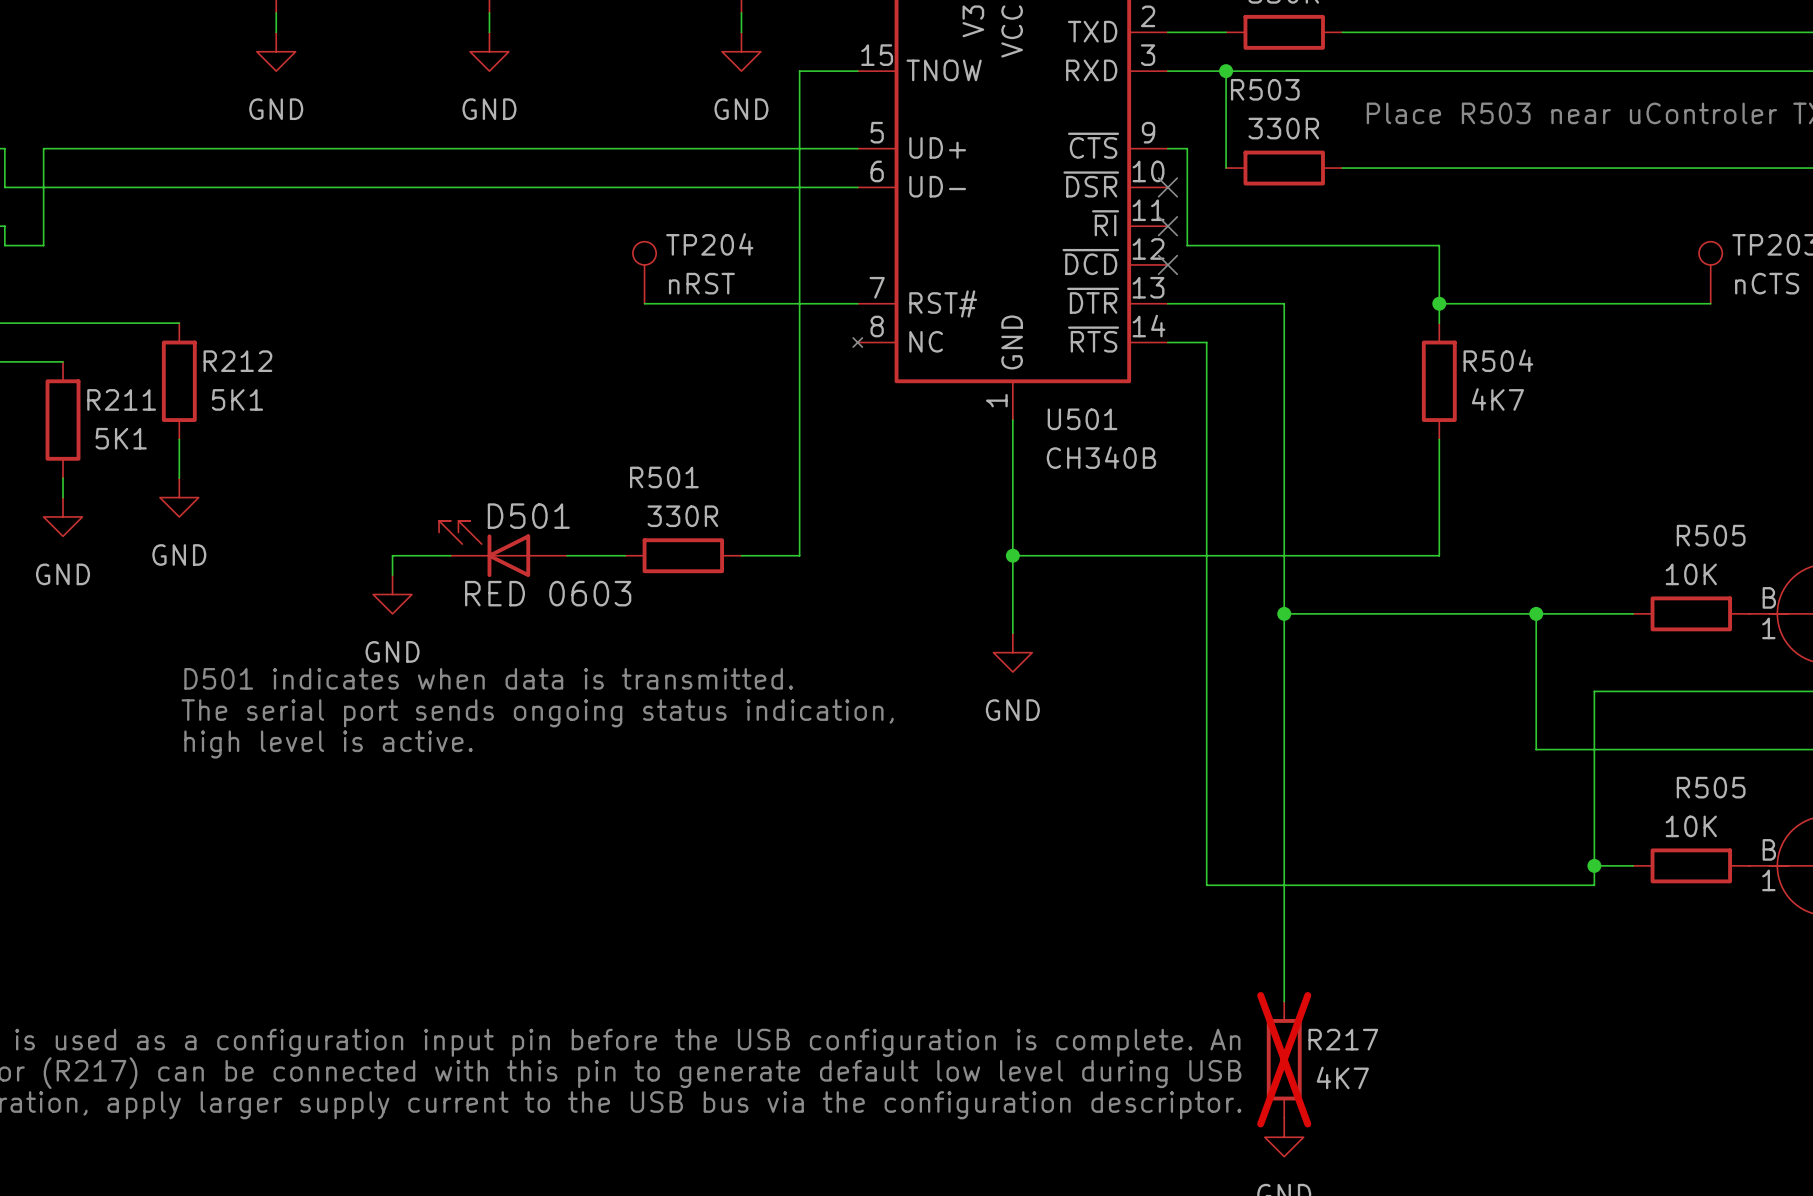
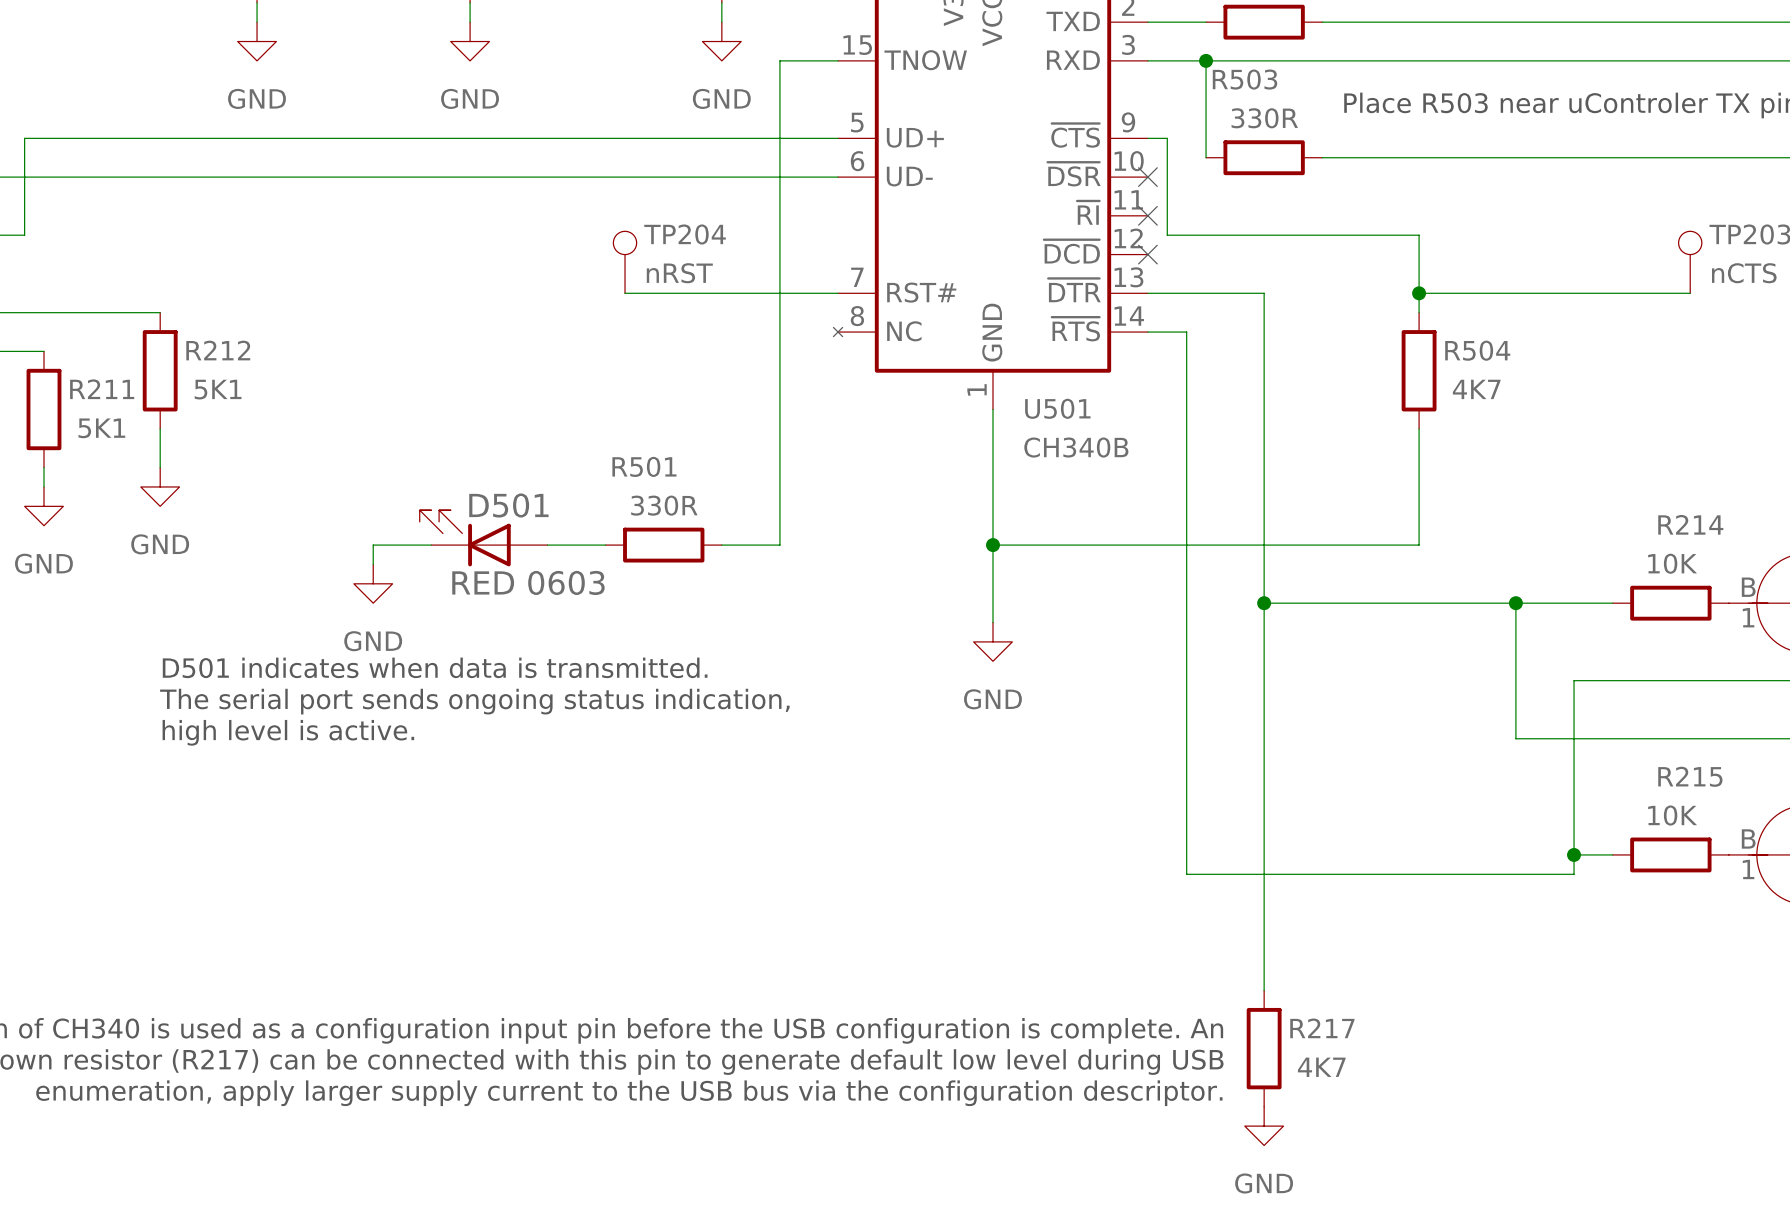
R505 name: R505 (1711, 535) -> R214 (1690, 524)
R505 name: R505 (1711, 787) -> R215 (1690, 776)
R217 do-not-place cross: (1284, 1059) -> none

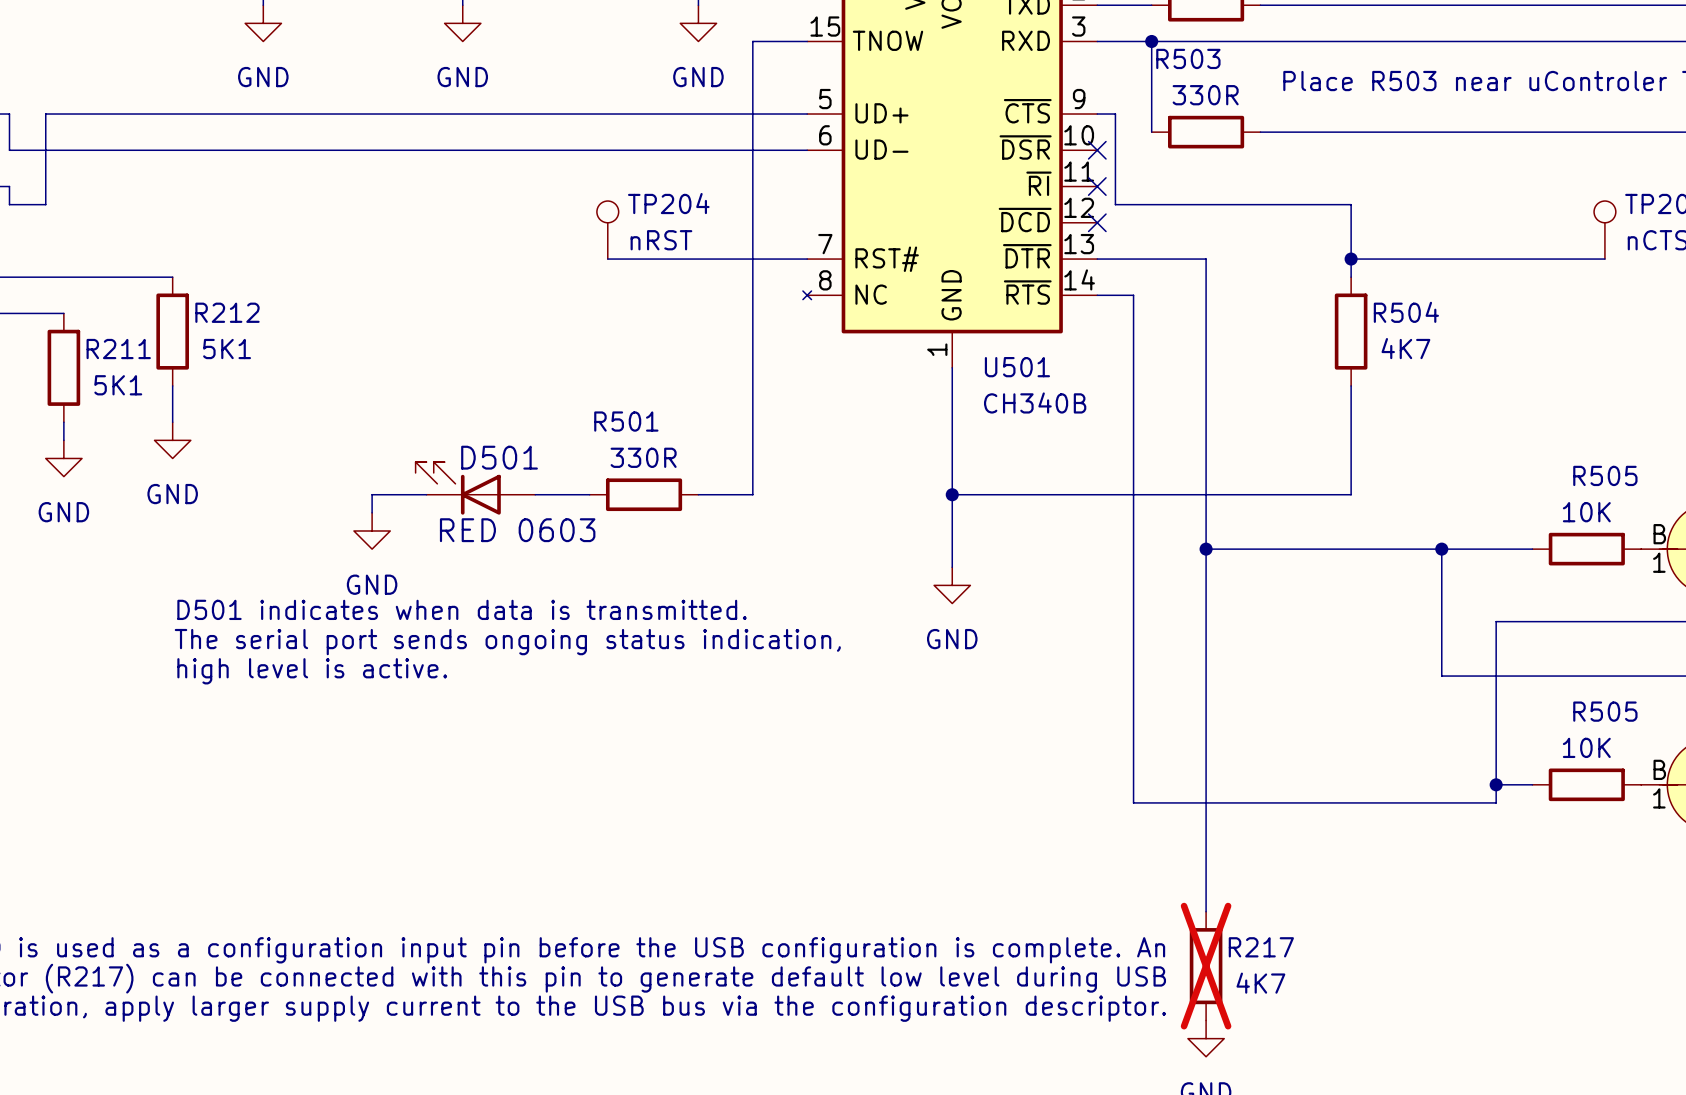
R214 name: R214 (1690, 524) -> R505 (1605, 475)
R215 name: R215 (1690, 776) -> R505 (1605, 711)
R217 do-not-place cross: none -> (1206, 966)

